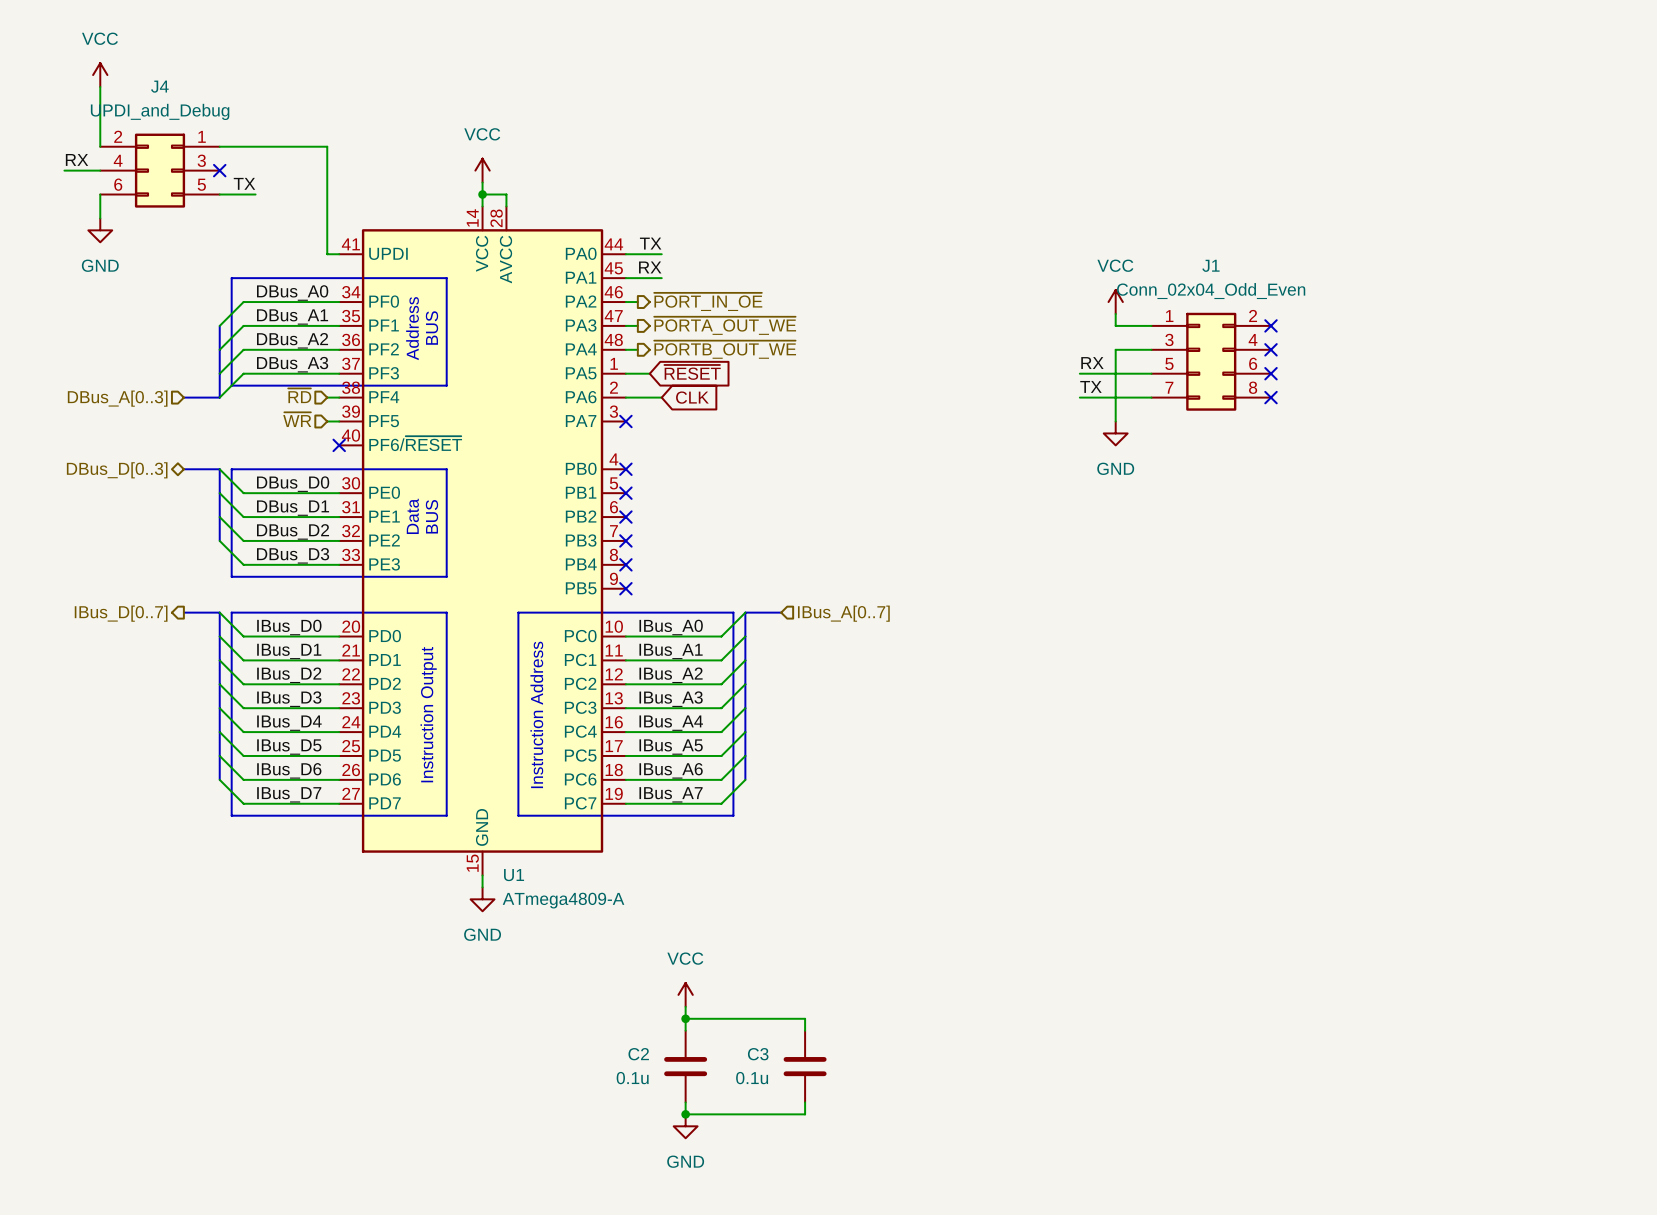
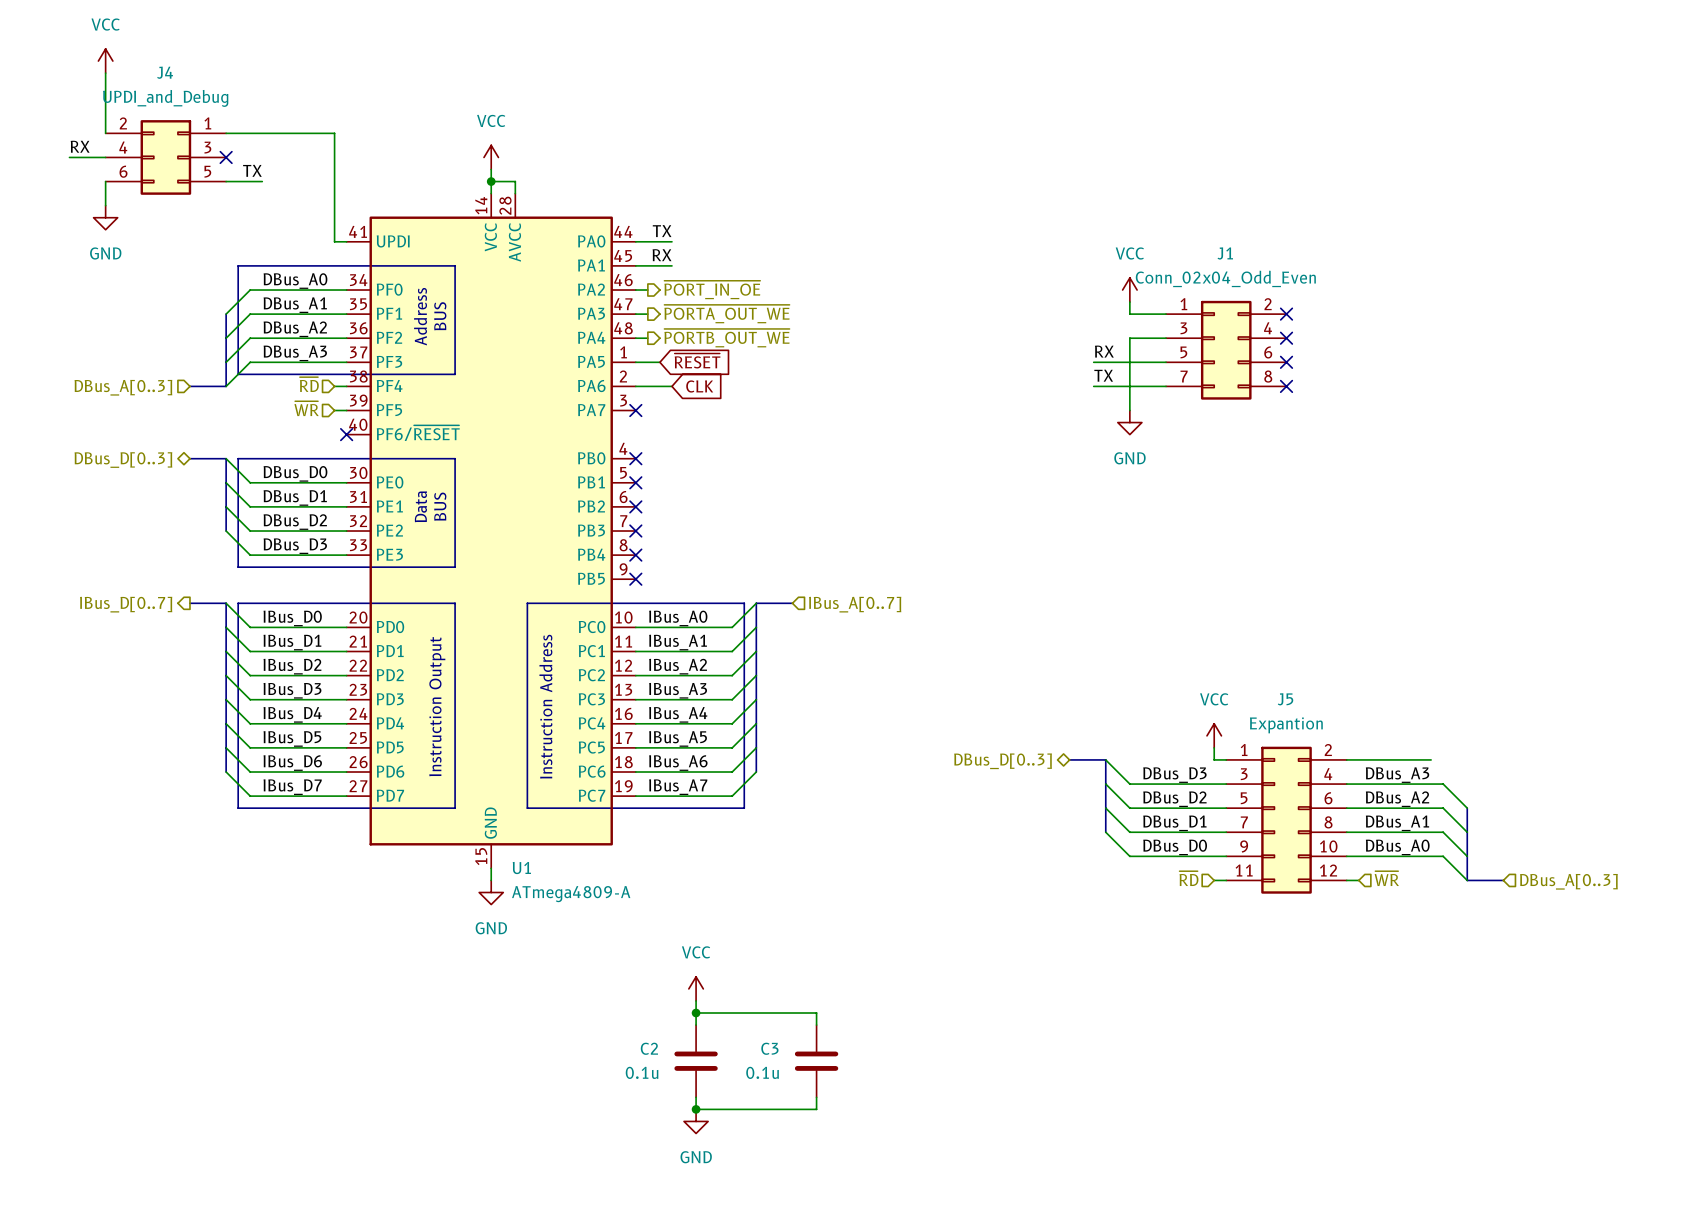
power symbol: none -> VCC (1214, 735)
wire: none -> (1214, 747) (1214, 759) (1226, 759)
bus: none -> (1069, 759) (1105, 759) (1105, 832)
wire: none -> (1105, 759) (1129, 784) (1226, 784)
wire: none -> (1346, 759) (1431, 759)
hierarchical label: none -> DBus_D[0..3] (1003, 761)
label: none -> DBus_D3 (1174, 775)
label: none -> DBus_A3 (1397, 775)
wire: none -> (1105, 784) (1129, 808) (1226, 808)
wire: none -> (1346, 784) (1443, 784) (1467, 808)
label: none -> DBus_D2 (1174, 799)
label: none -> DBus_A2 (1397, 799)
wire: none -> (1105, 808) (1129, 832) (1226, 832)
wire: none -> (1346, 808) (1443, 808) (1467, 832)
bus: none -> (1467, 808) (1467, 880) (1503, 880)
J5: none -> Expantion (1286, 820)
label: none -> DBus_D1 (1174, 823)
label: none -> DBus_A1 (1397, 823)
wire: none -> (1105, 832) (1129, 856) (1226, 856)
wire: none -> (1346, 832) (1443, 832) (1467, 856)
label: none -> DBus_D0 (1175, 847)
label: none -> DBus_A0 (1397, 847)
wire: none -> (1346, 856) (1443, 856) (1467, 880)
hierarchical label: none -> ~{RD} (1188, 878)
hierarchical label: none -> ~{WR} (1386, 878)
wire: none -> (1214, 880) (1226, 880)
wire: none -> (1346, 880) (1358, 880)
hierarchical label: none -> DBus_A[0..3] (1568, 881)

